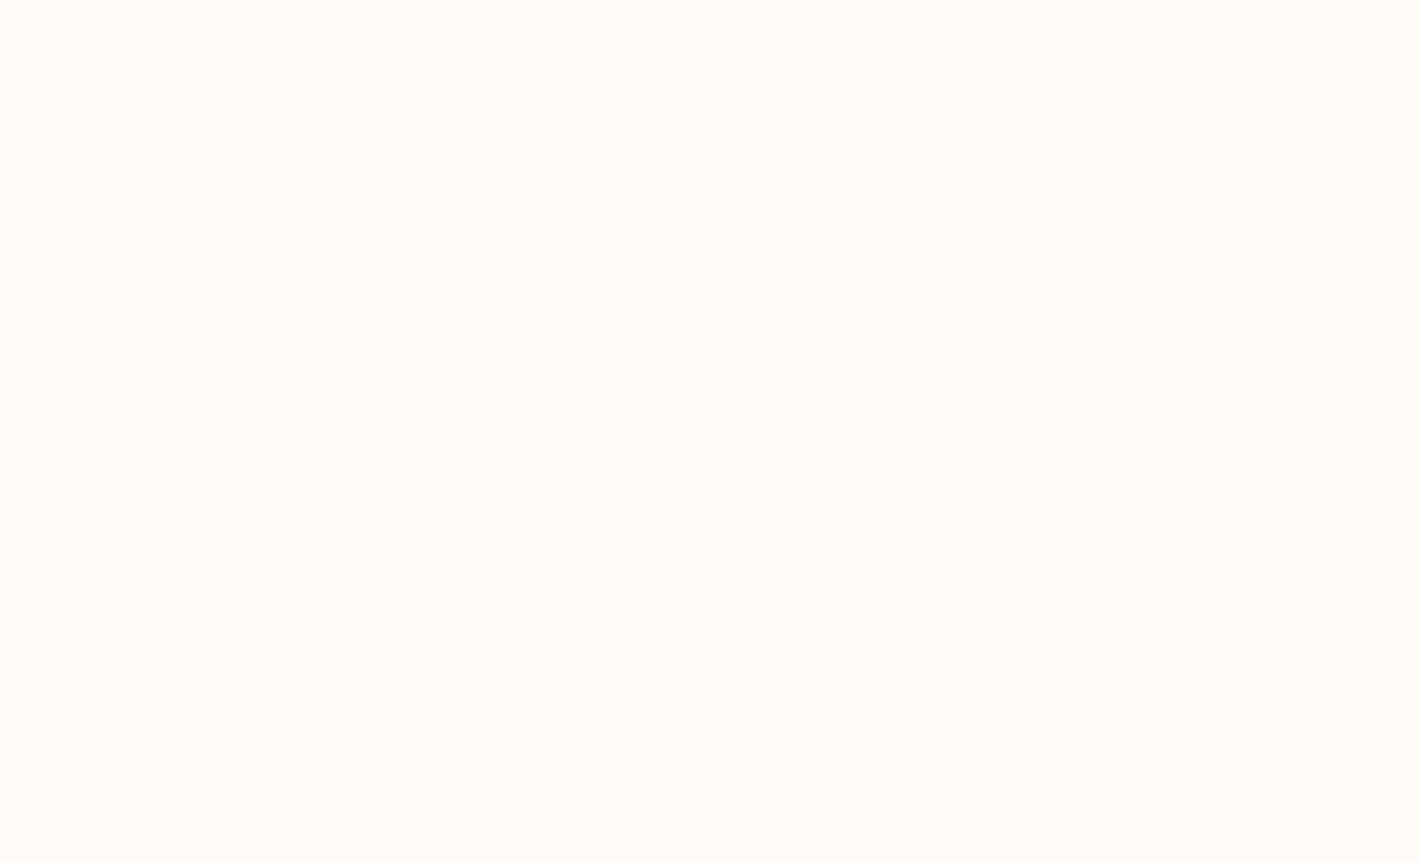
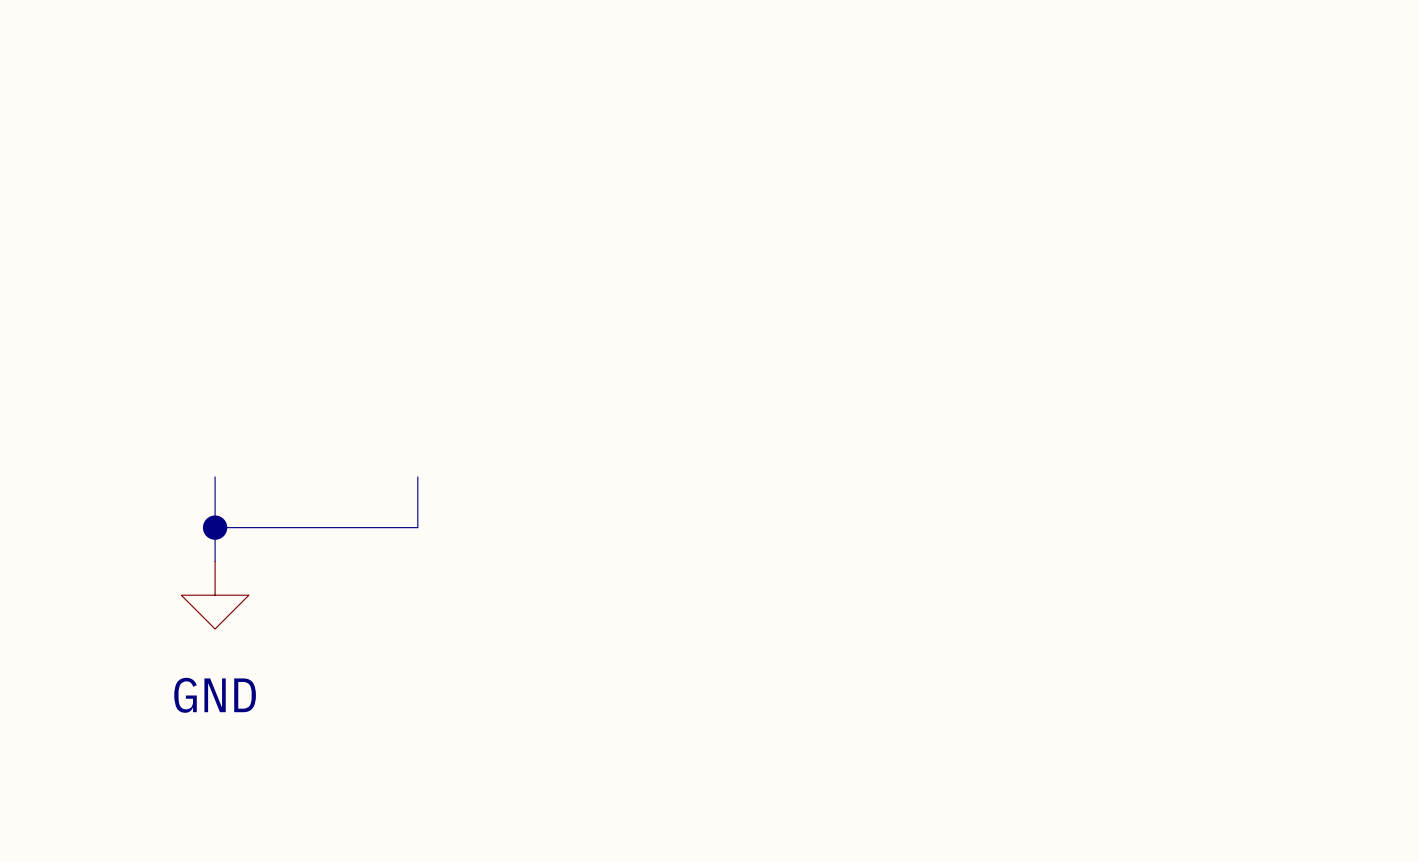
wire: none -> (215, 476) (215, 561)
wire: none -> (417, 476) (417, 527) (215, 527)
junction: none -> (215, 527)
power symbol: none -> GND (215, 595)

